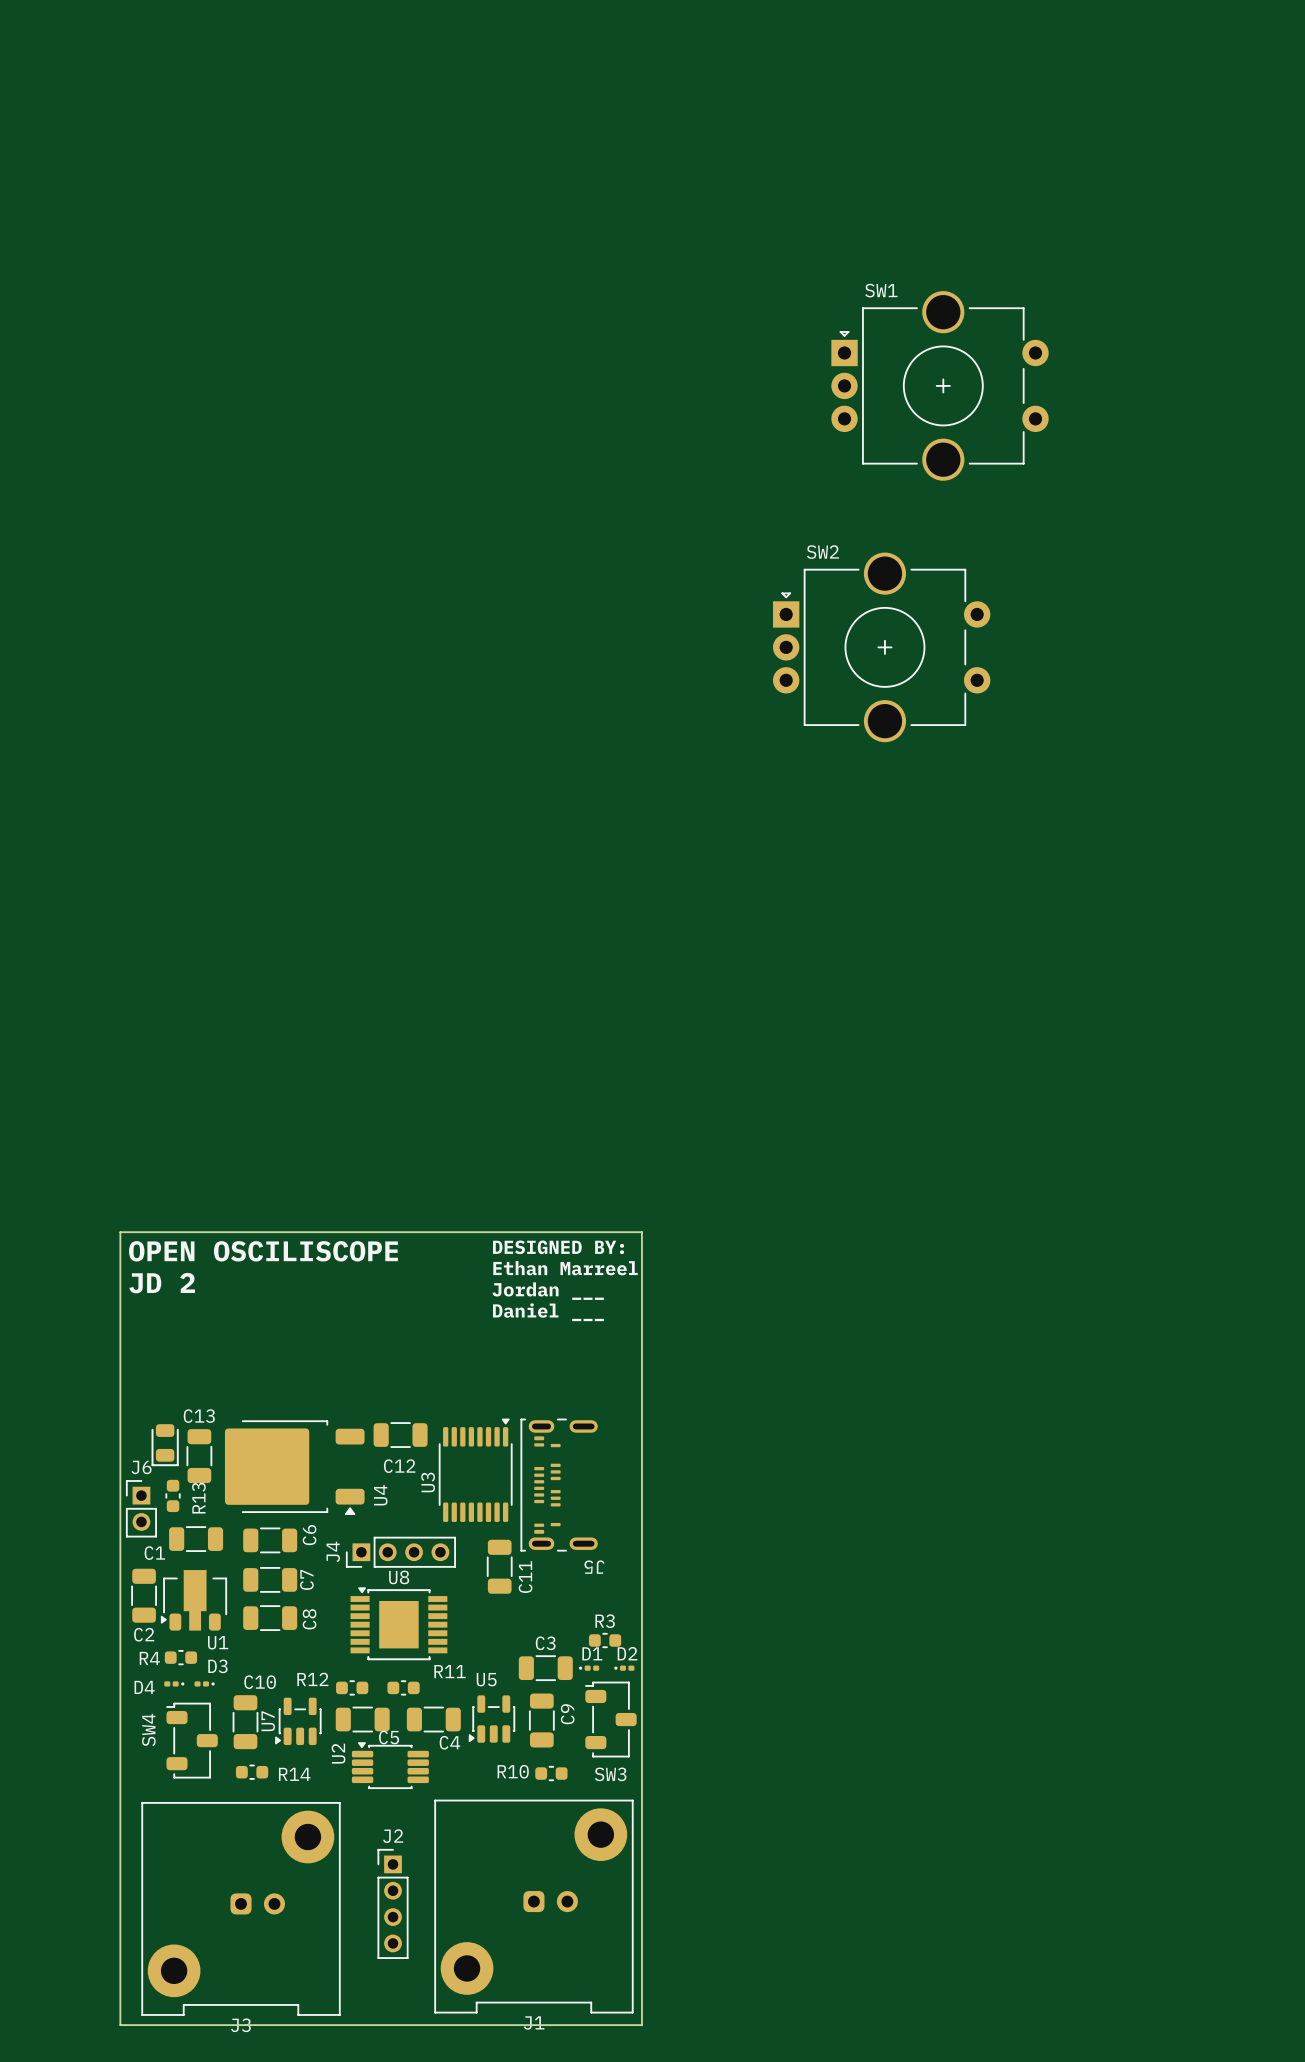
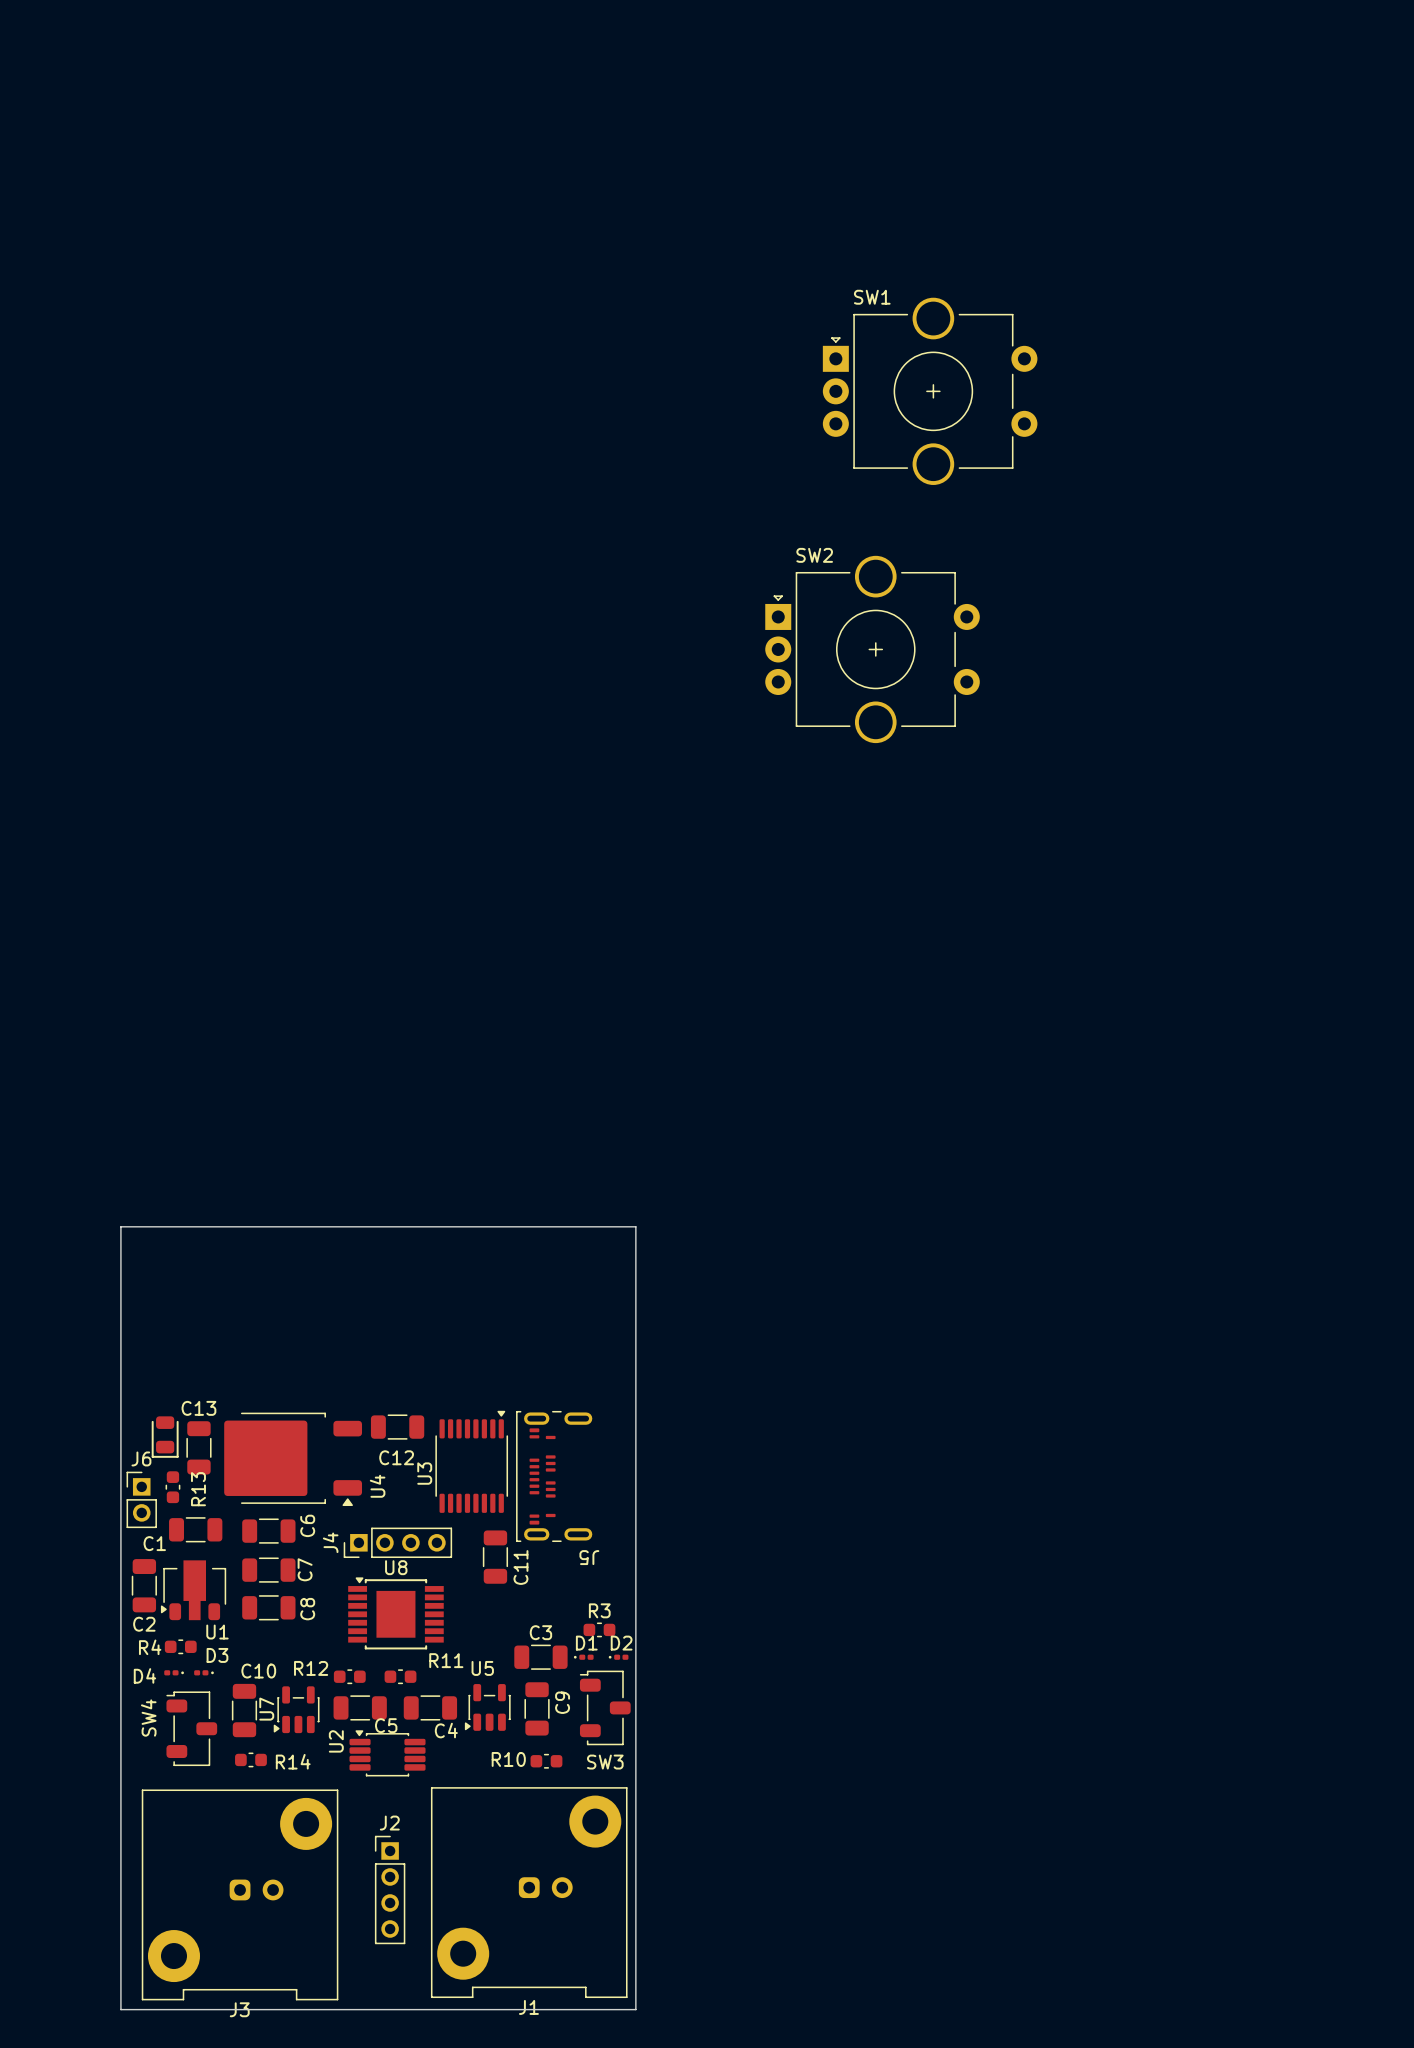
text: DESIGNED BY: (558, 1247) -> none
text: OPEN OSCILISCOPE (263, 1251) -> none
text: Ethan Marreel (565, 1268) -> none
text: JD 2 (162, 1283) -> none
text: Jordan ___ (548, 1291) -> none
text: Daniel ___ (548, 1312) -> none

